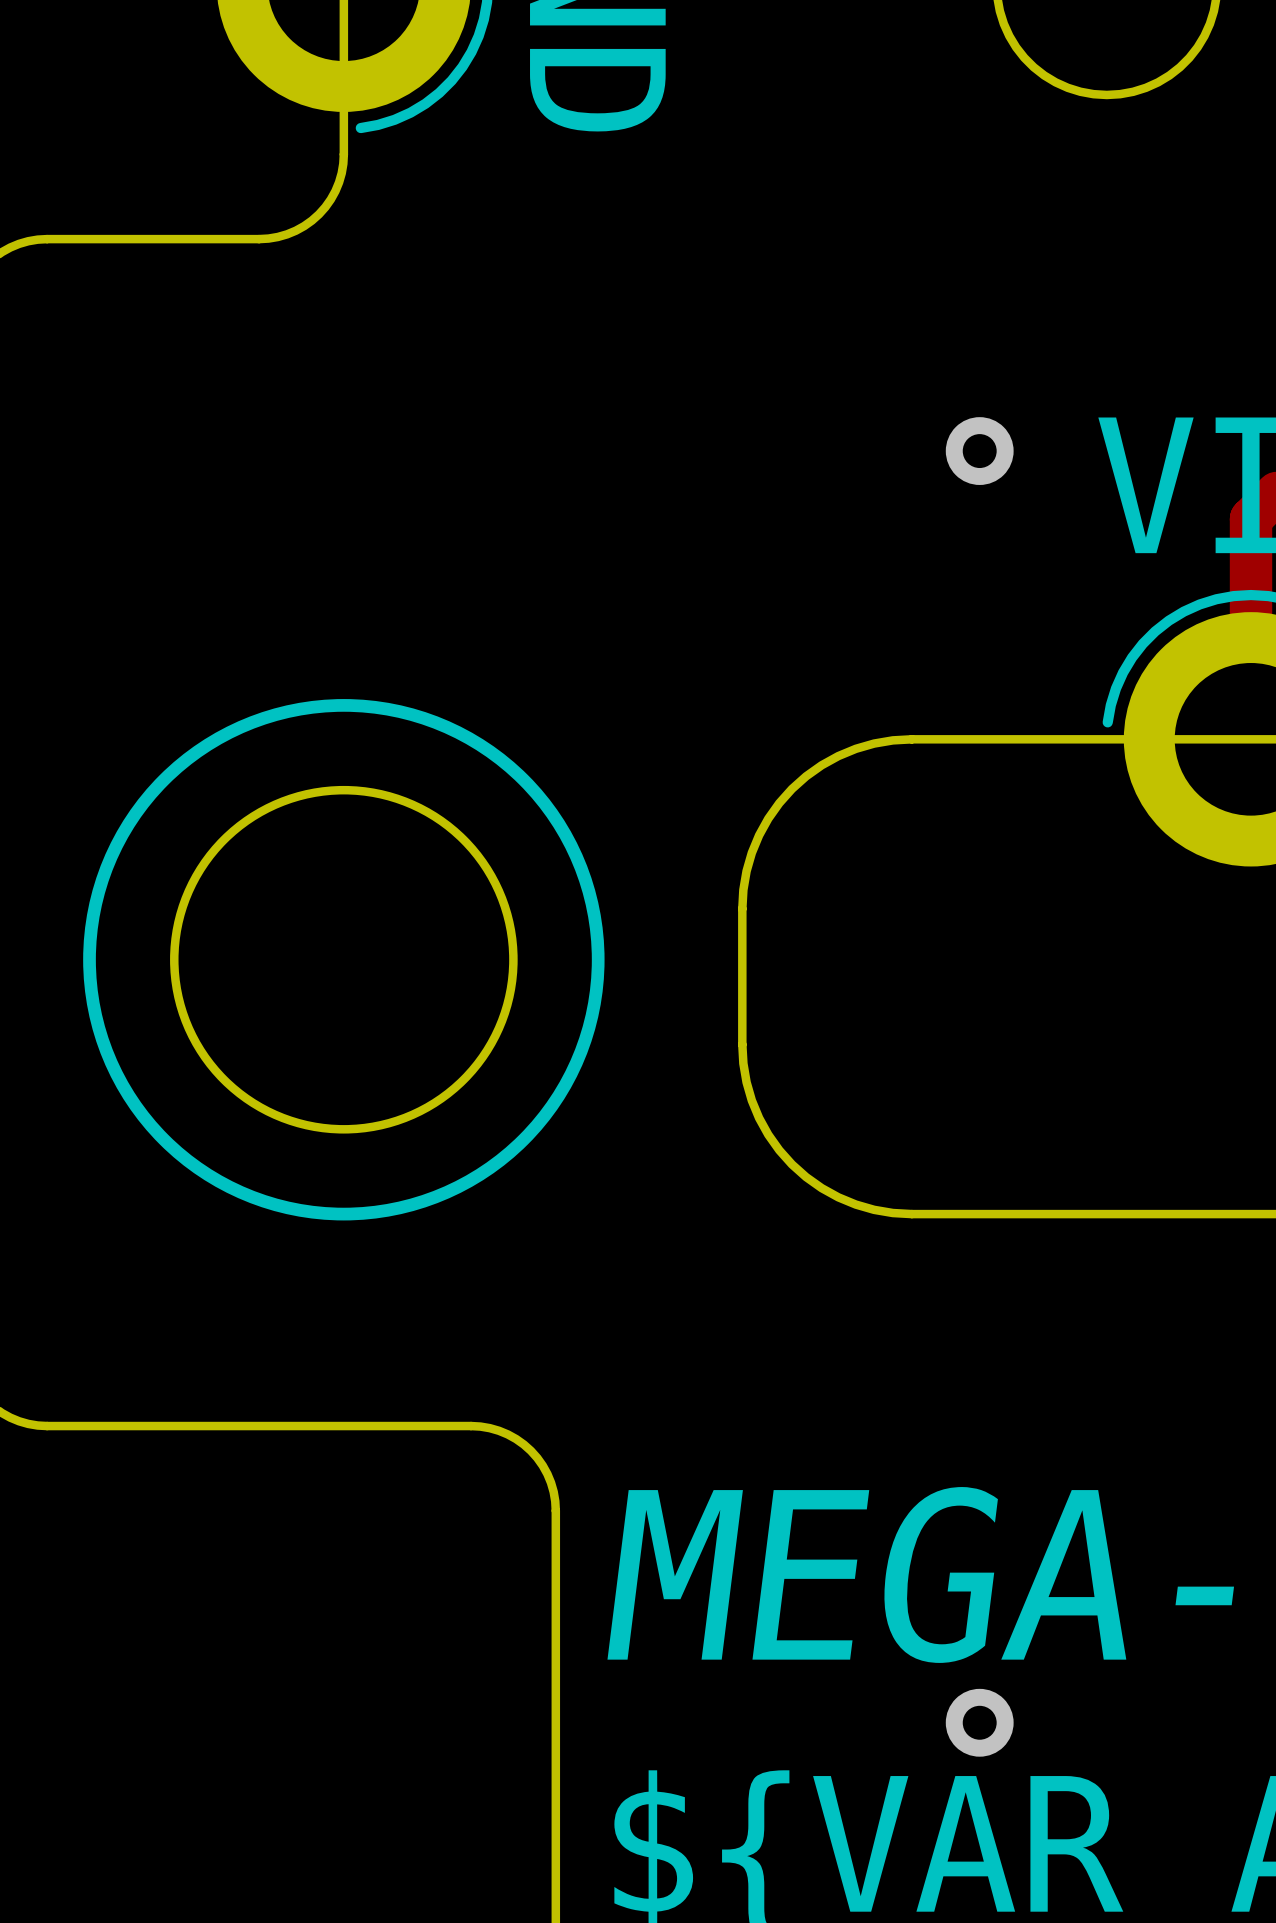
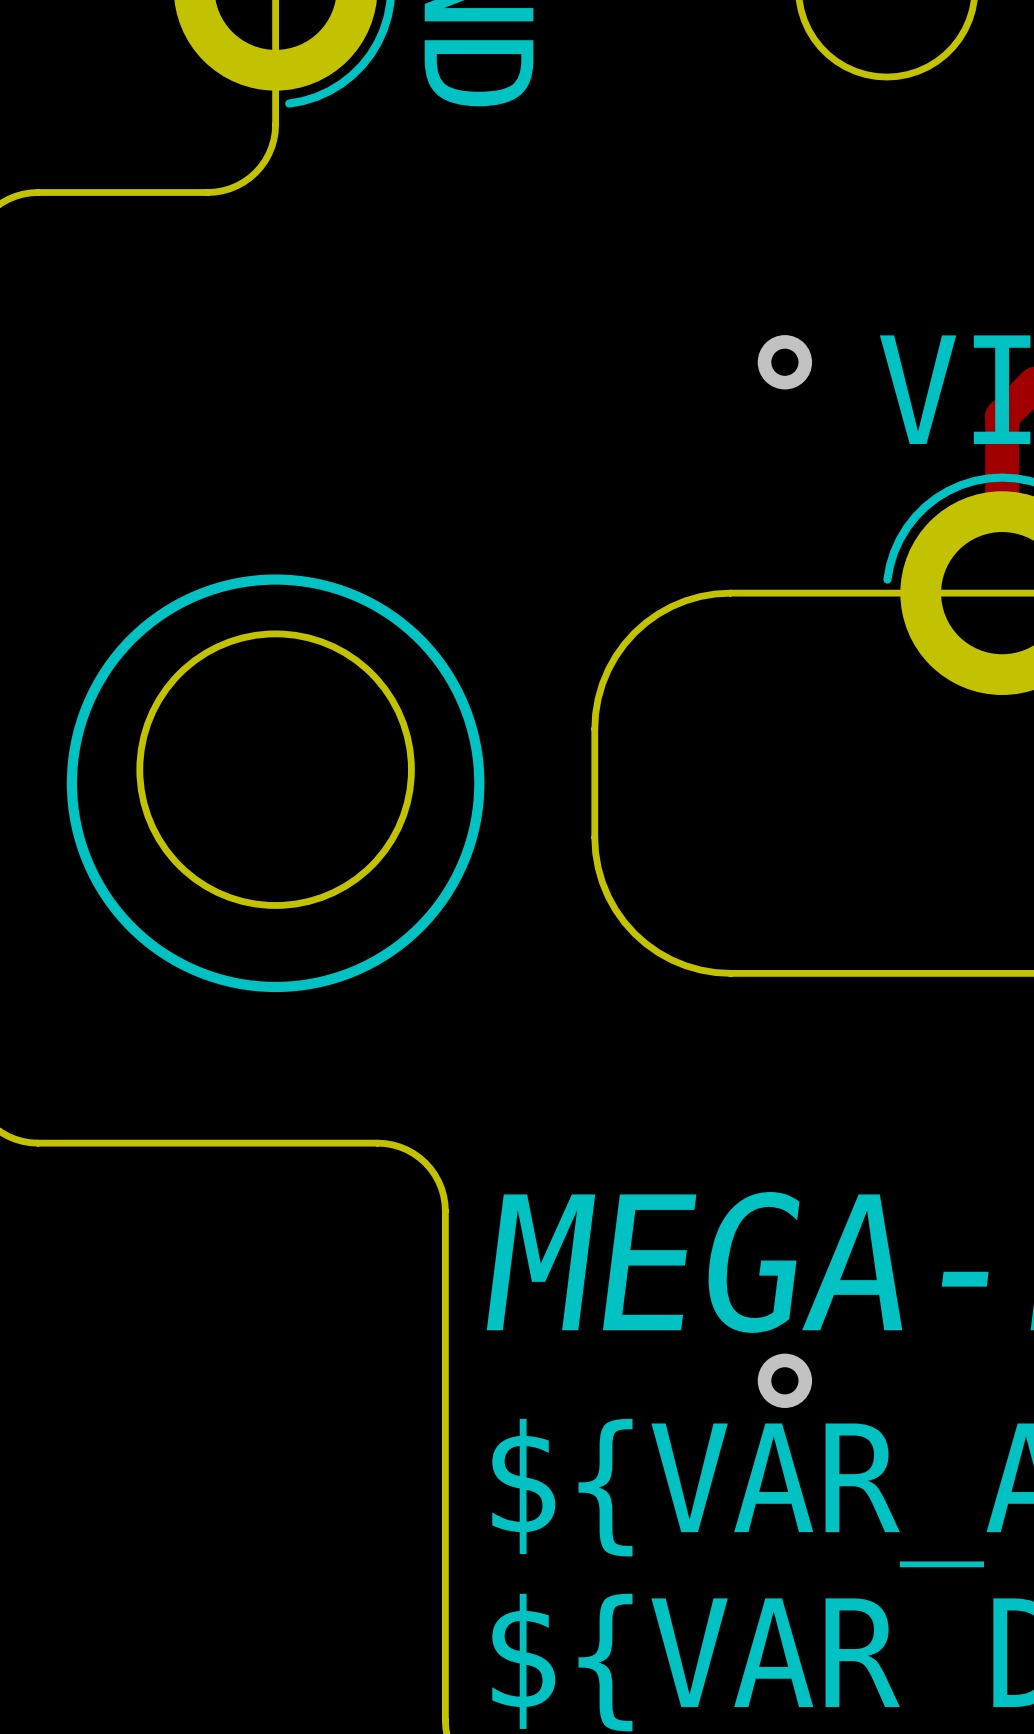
drawing position: (343, 959) -> (275, 783)

